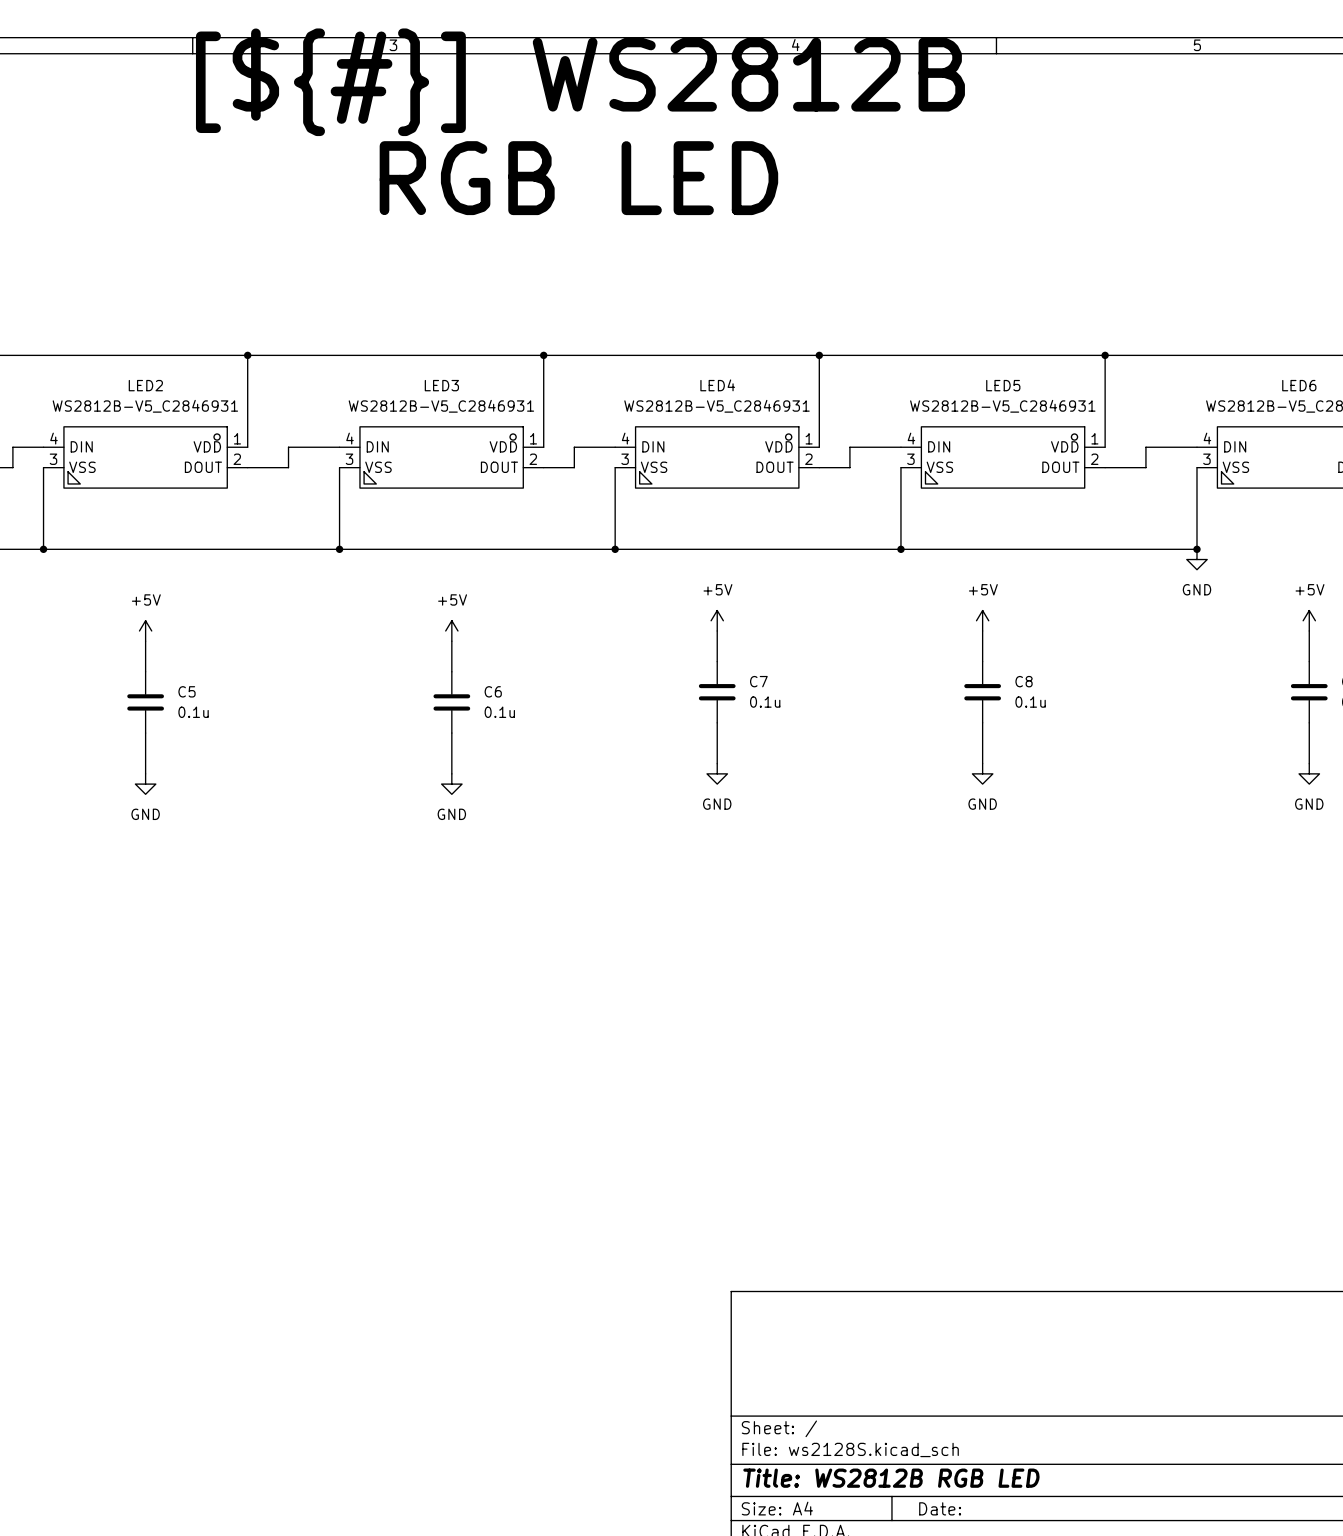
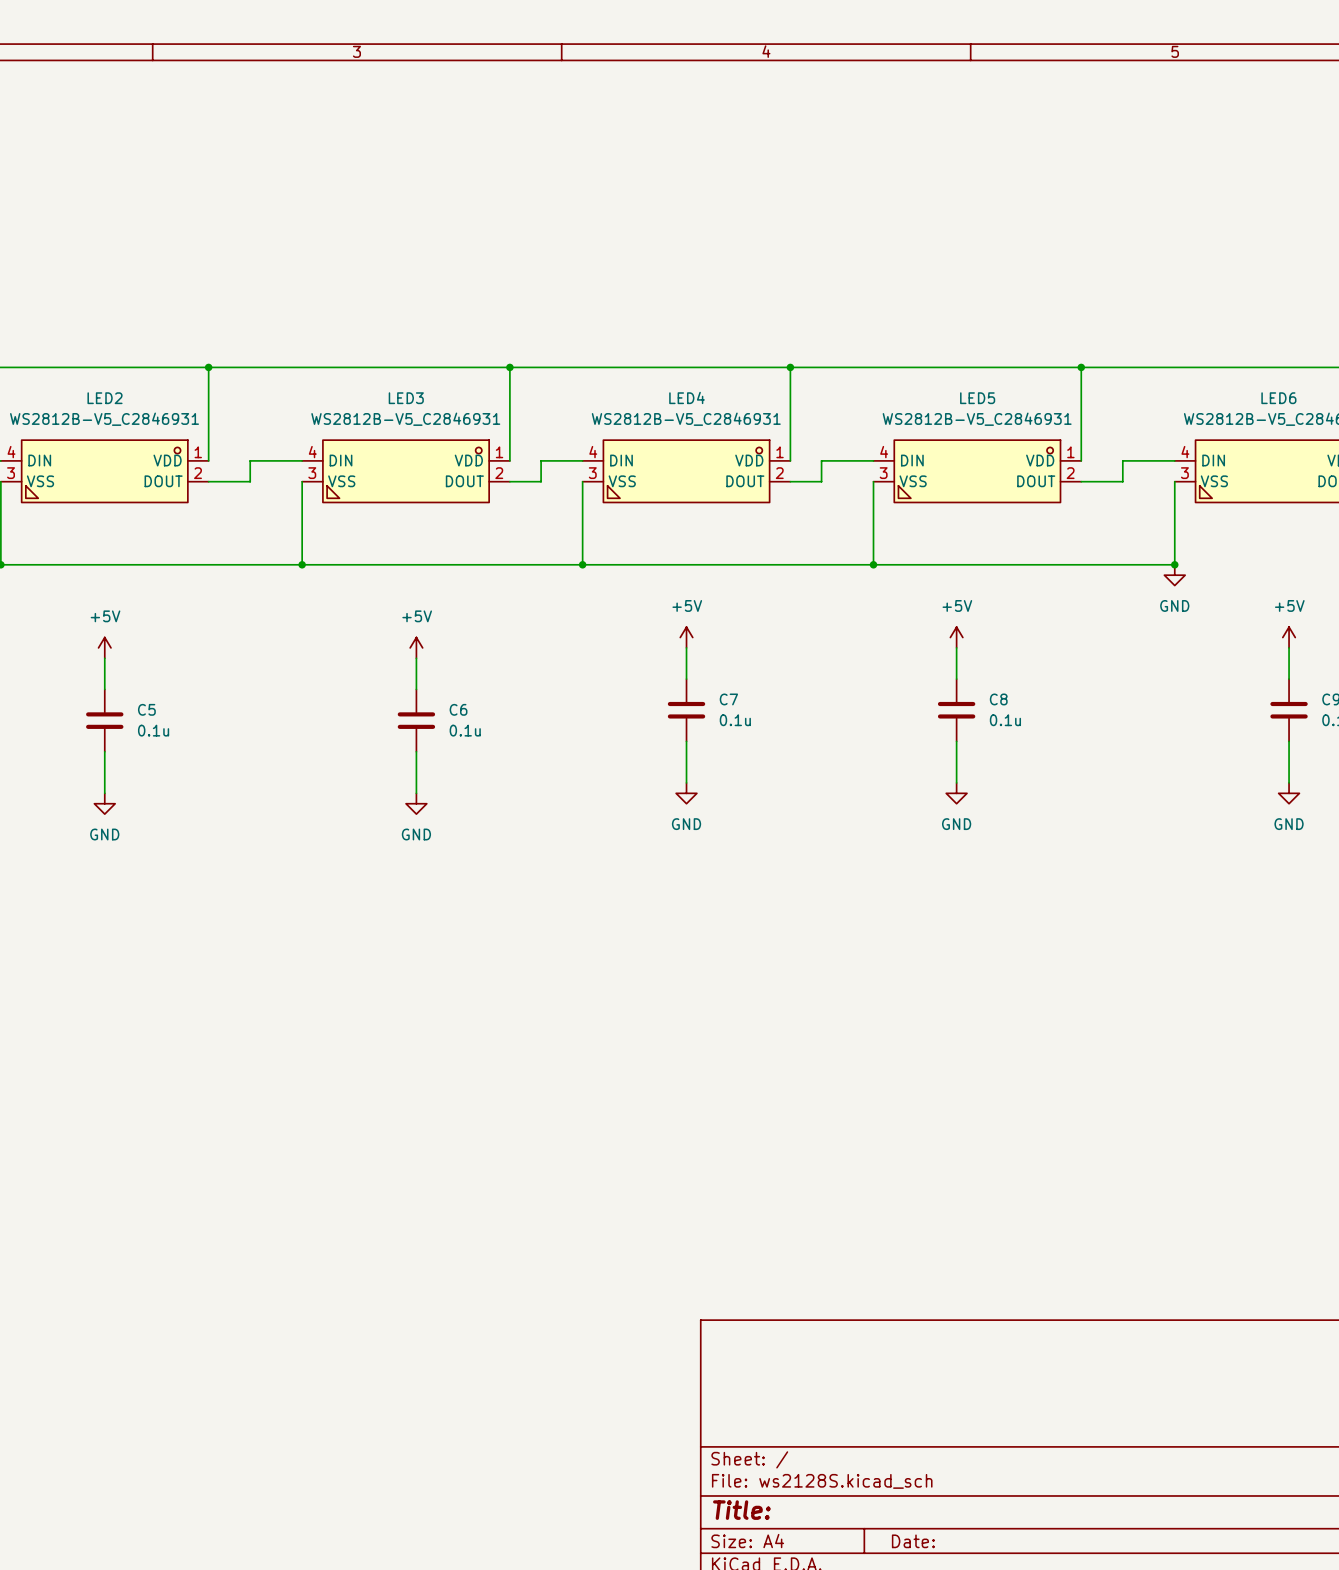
text: [${#}] WS2812B (580, 82) -> none
text: RGB LED (578, 178) -> none
title block: Title: WS2812B RGB LED (891, 1478) -> Title: (741, 1510)

